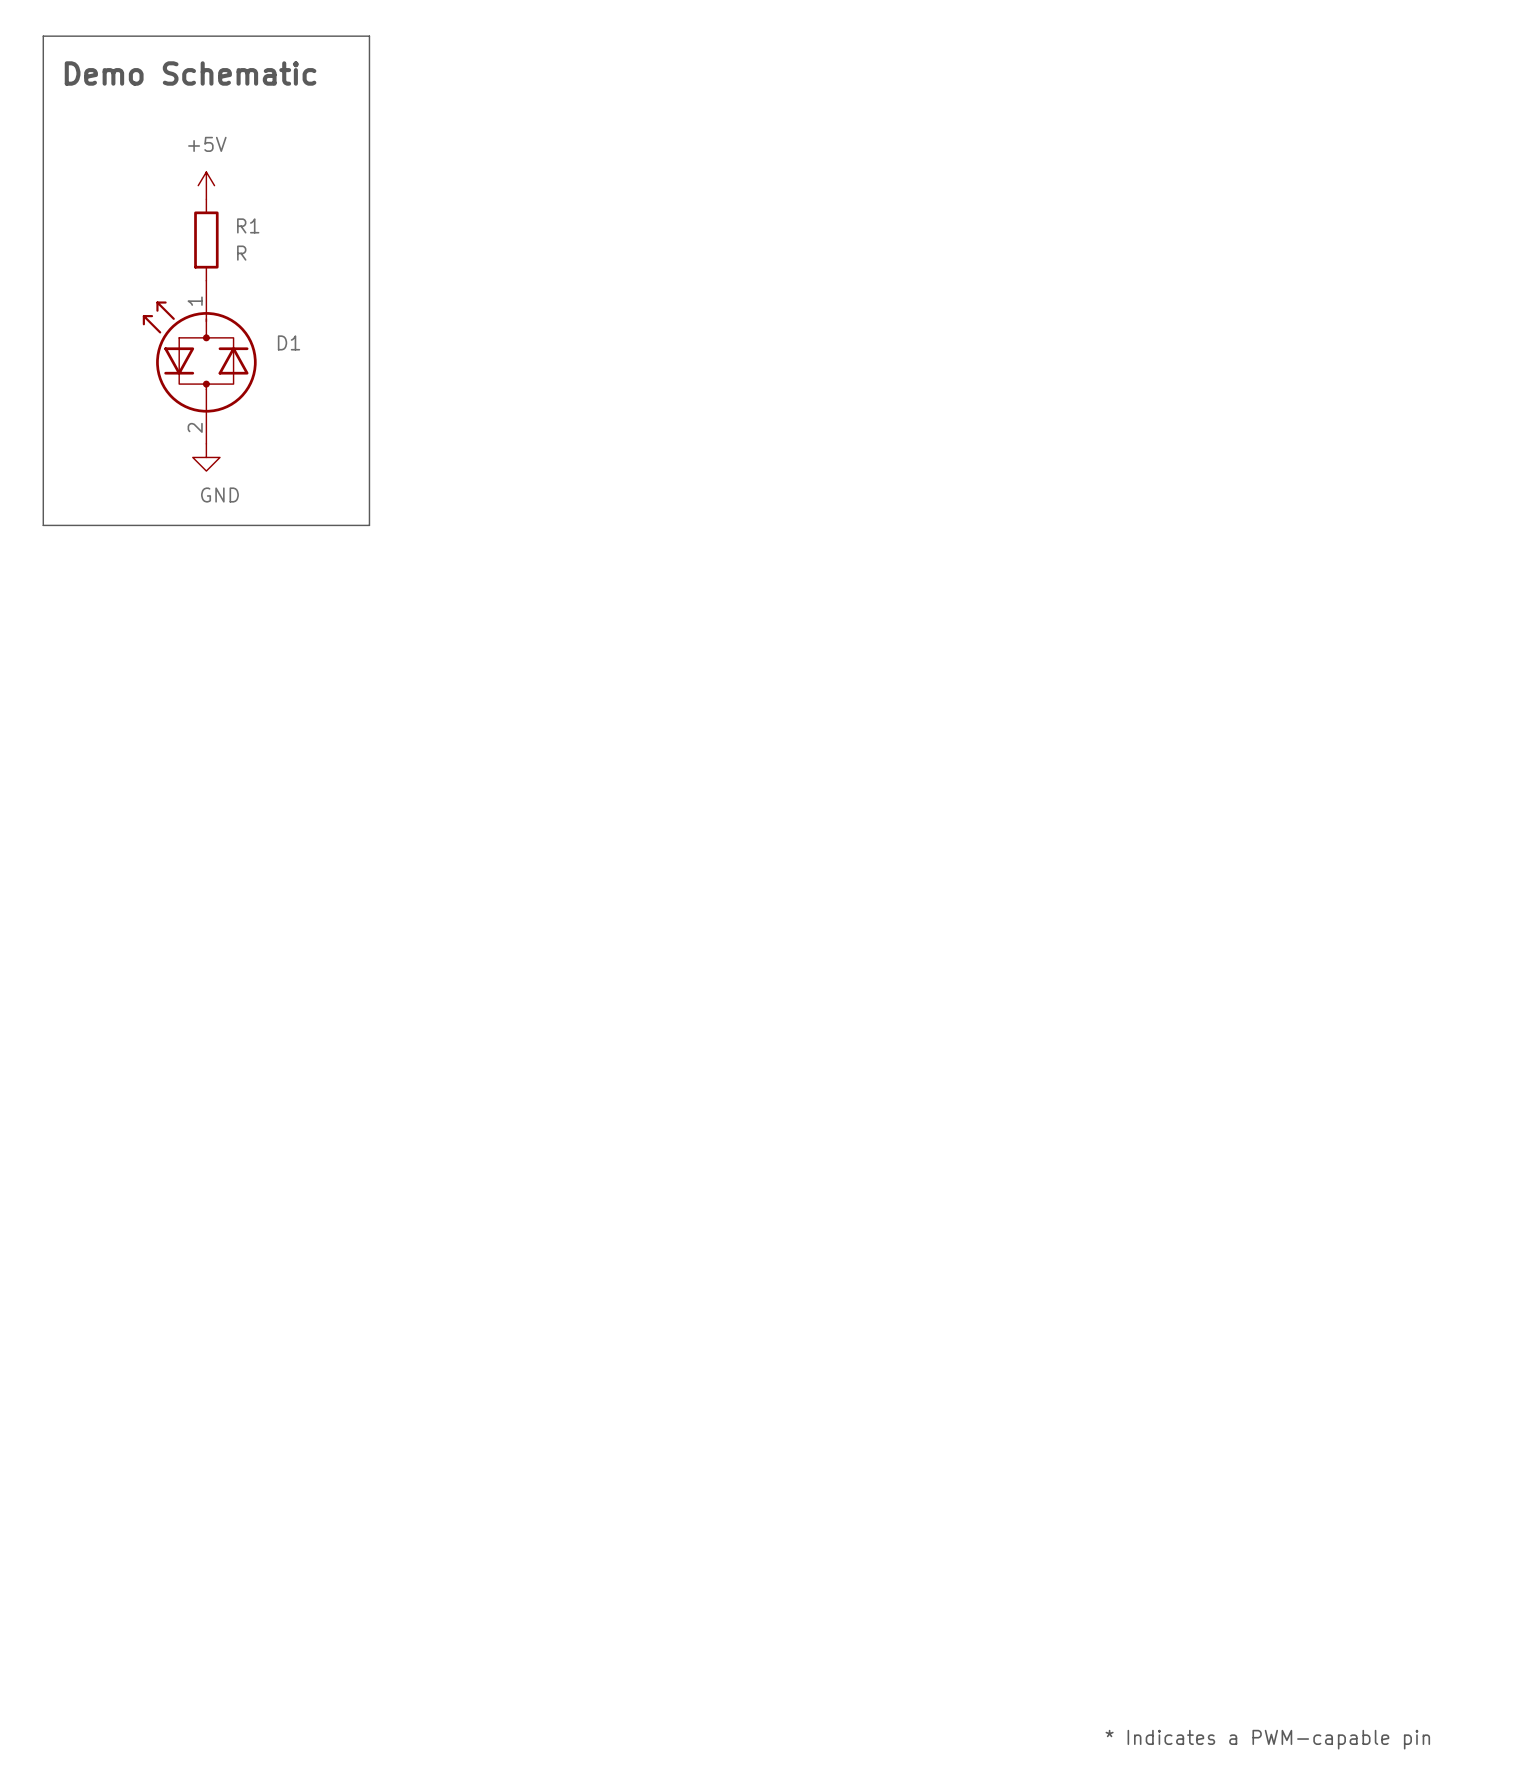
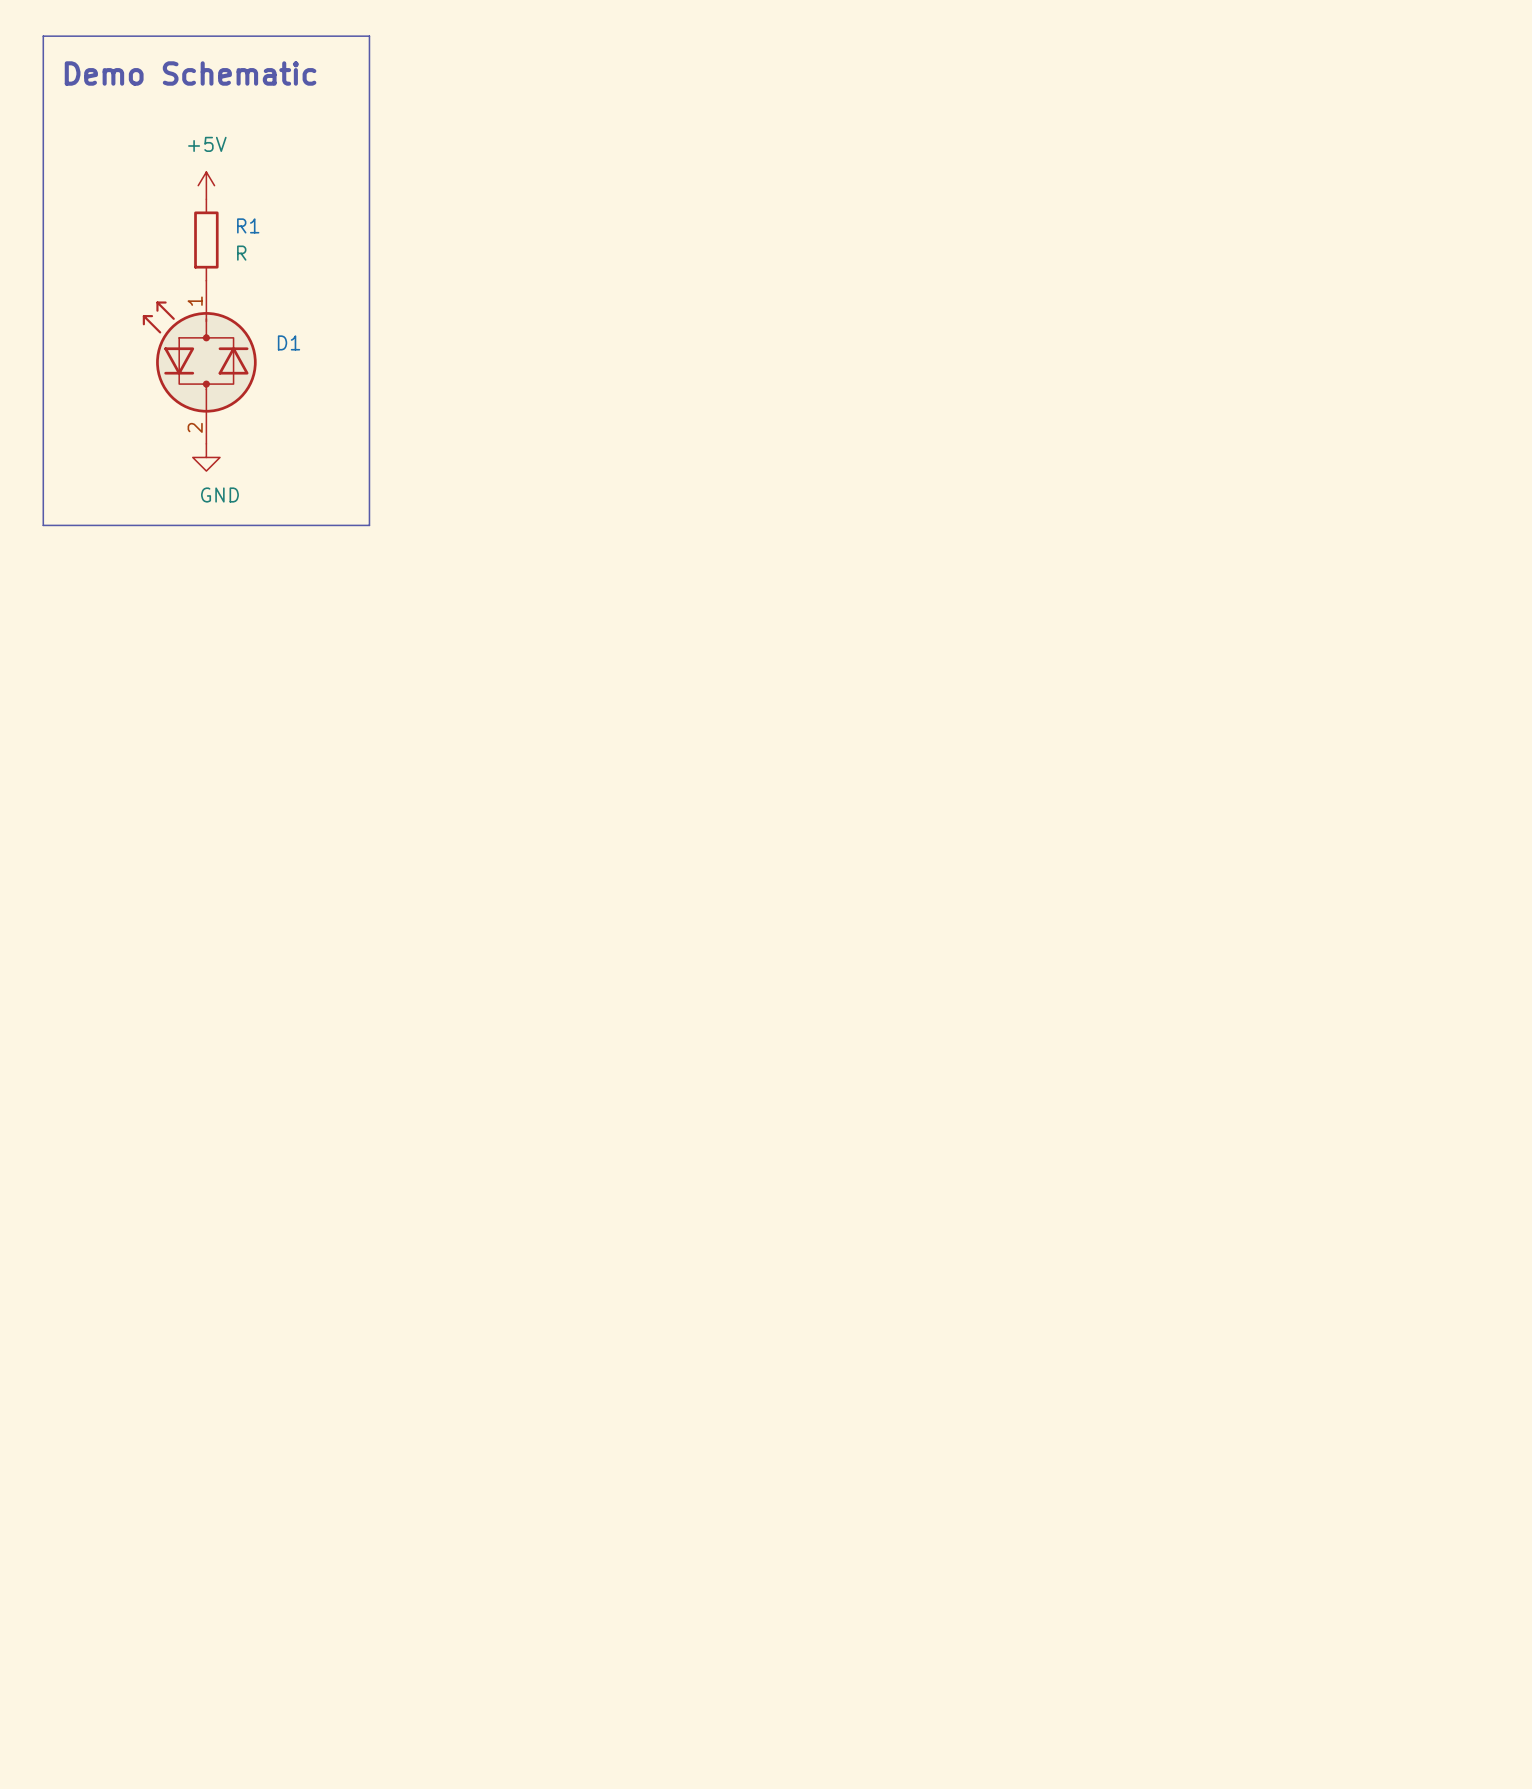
text: * Indicates a PWM-capable pin (1267, 1739) -> none

